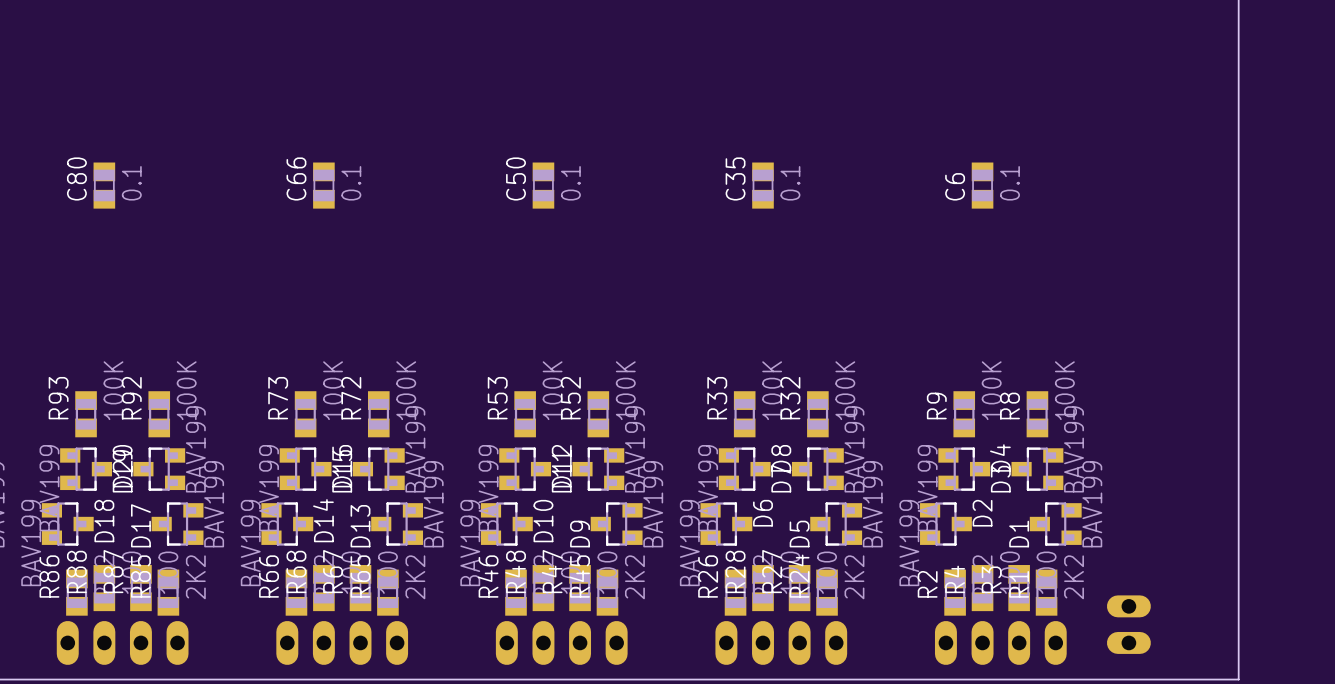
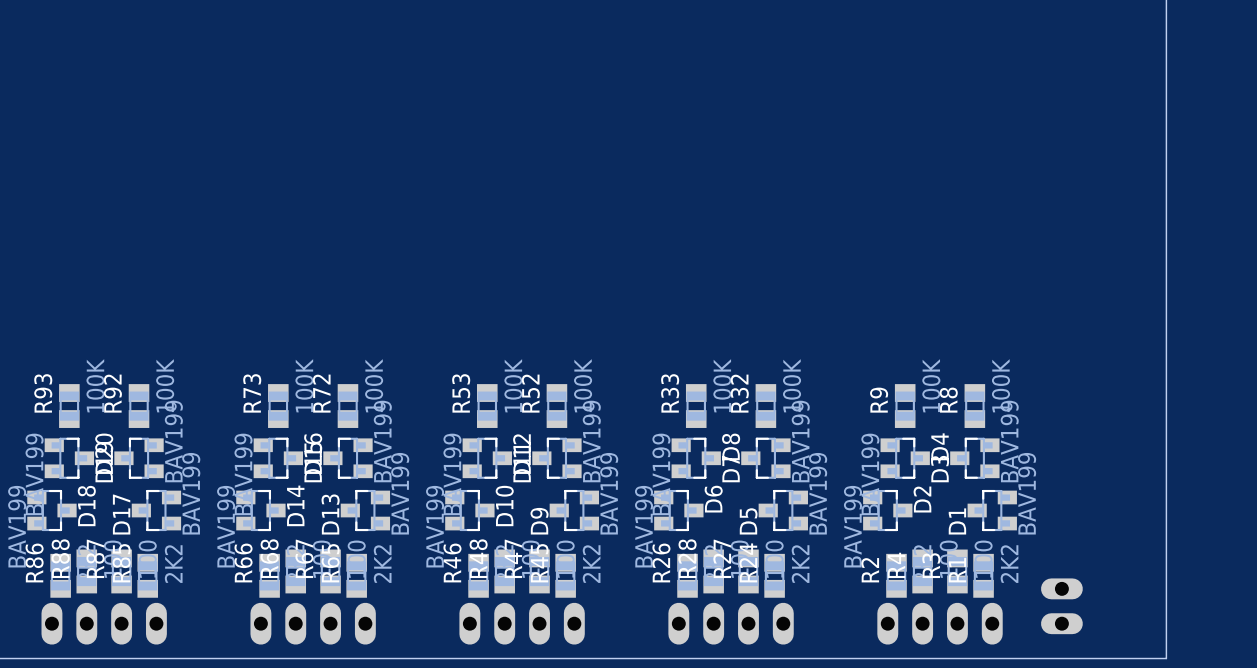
C80: 0.1 (104, 185) -> none
C66: 0.1 (323, 185) -> none
C50: 0.1 (543, 185) -> none
C35: 0.1 (762, 185) -> none
C6: 0.1 (982, 185) -> none

